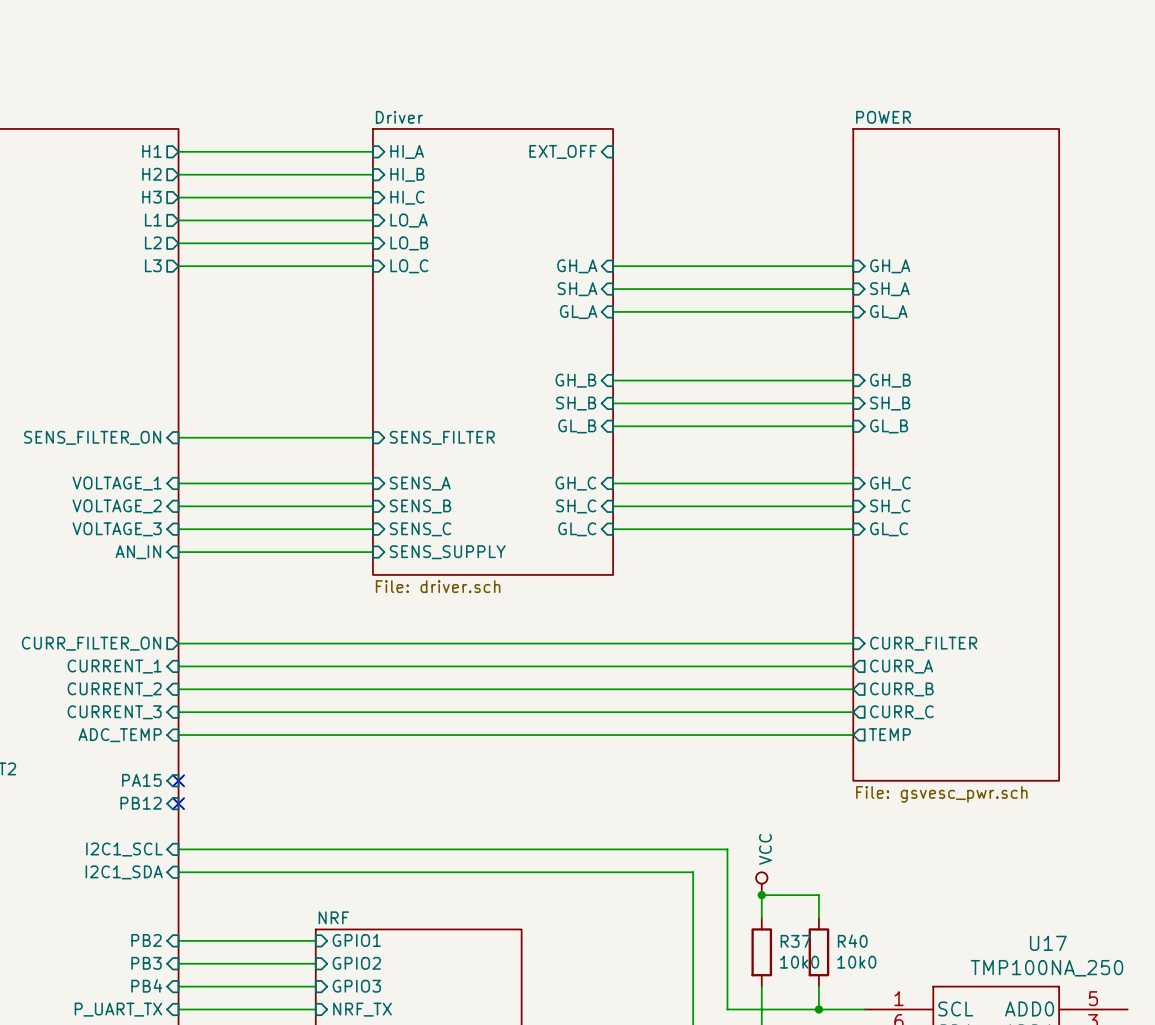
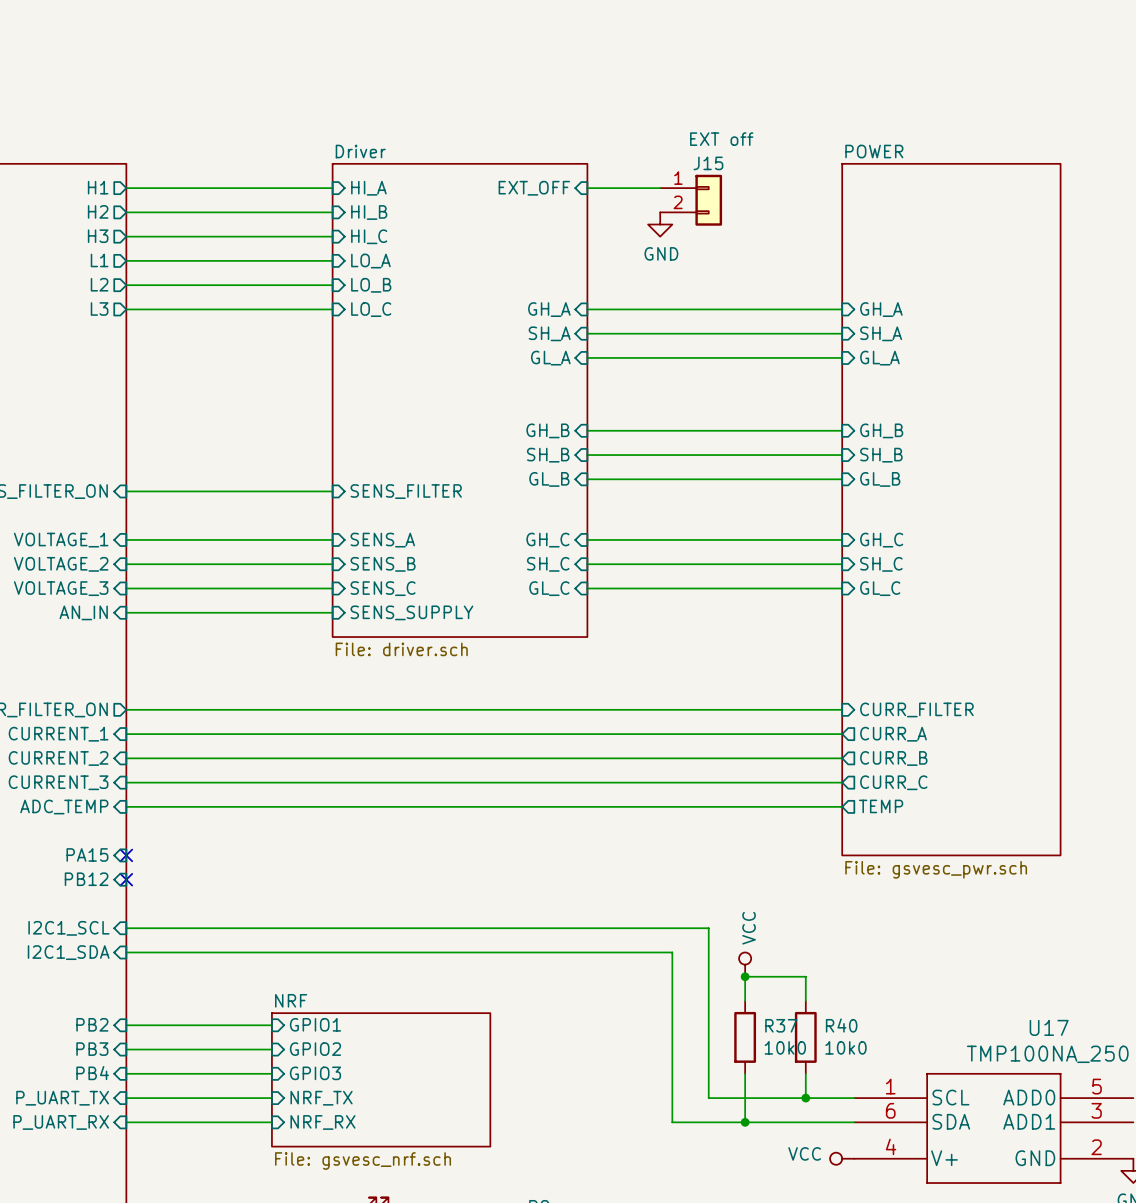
wire: none -> (587, 188) (660, 188)
J15: none -> EXT off (691, 200)
power symbol: none -> GND (660, 224)

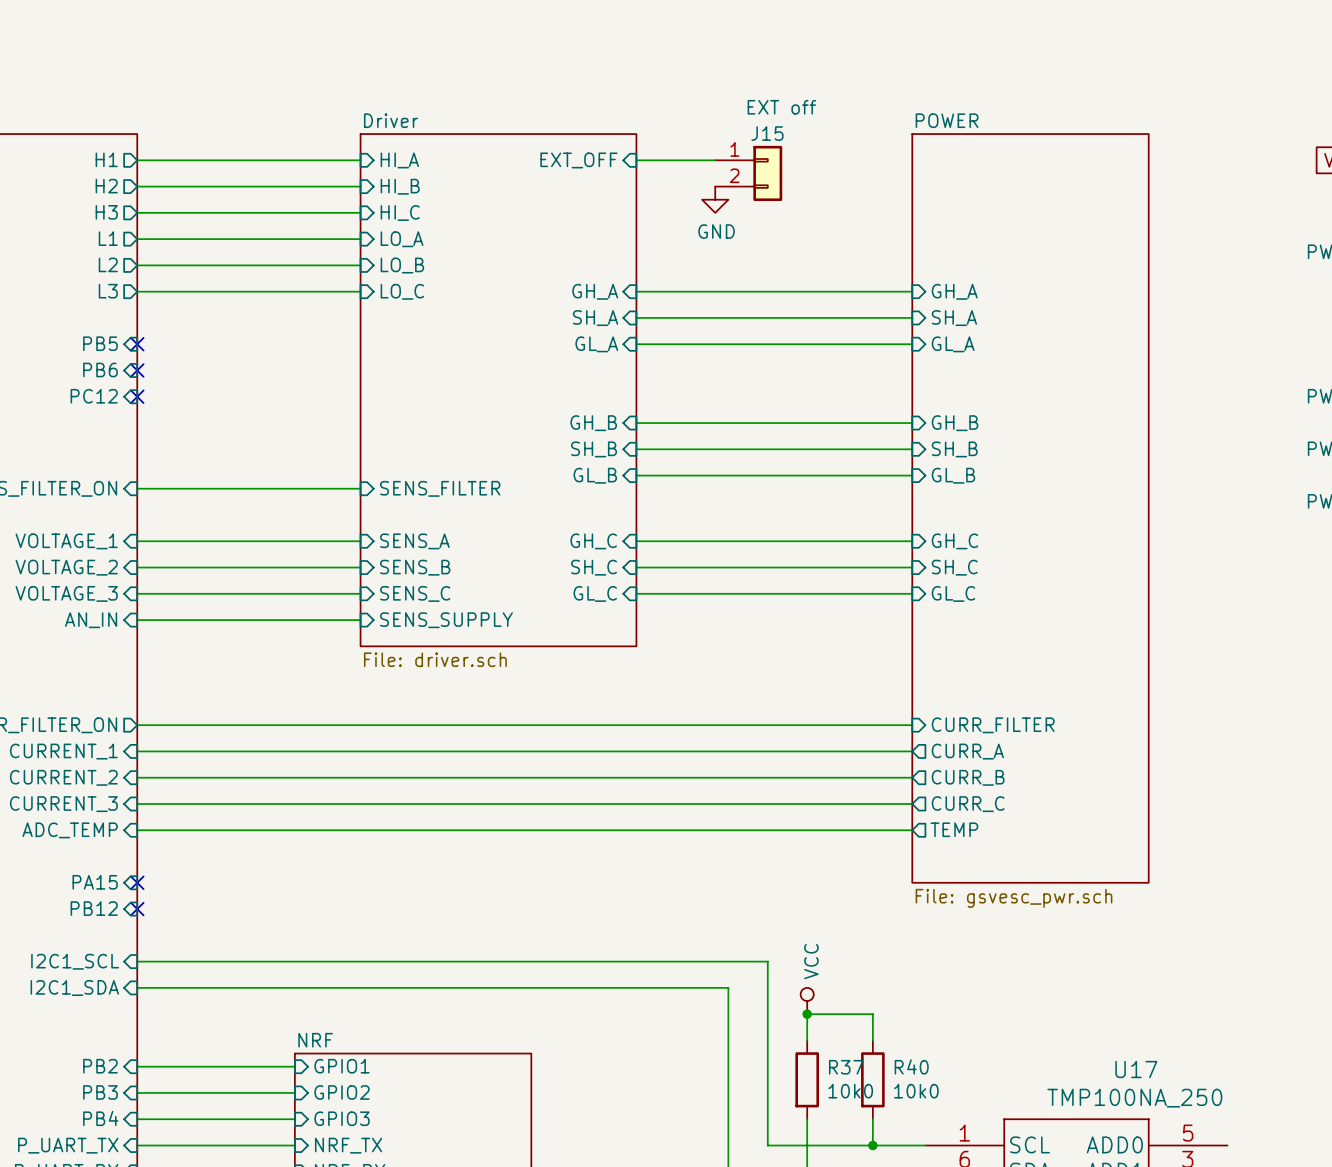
sheet pin: none -> PB5 (100, 343)
no-connect mark: none -> (137, 344)
sheet pin: none -> PB6 (100, 370)
no-connect mark: none -> (137, 370)
sheet pin: none -> PC12 (94, 396)
no-connect mark: none -> (137, 396)

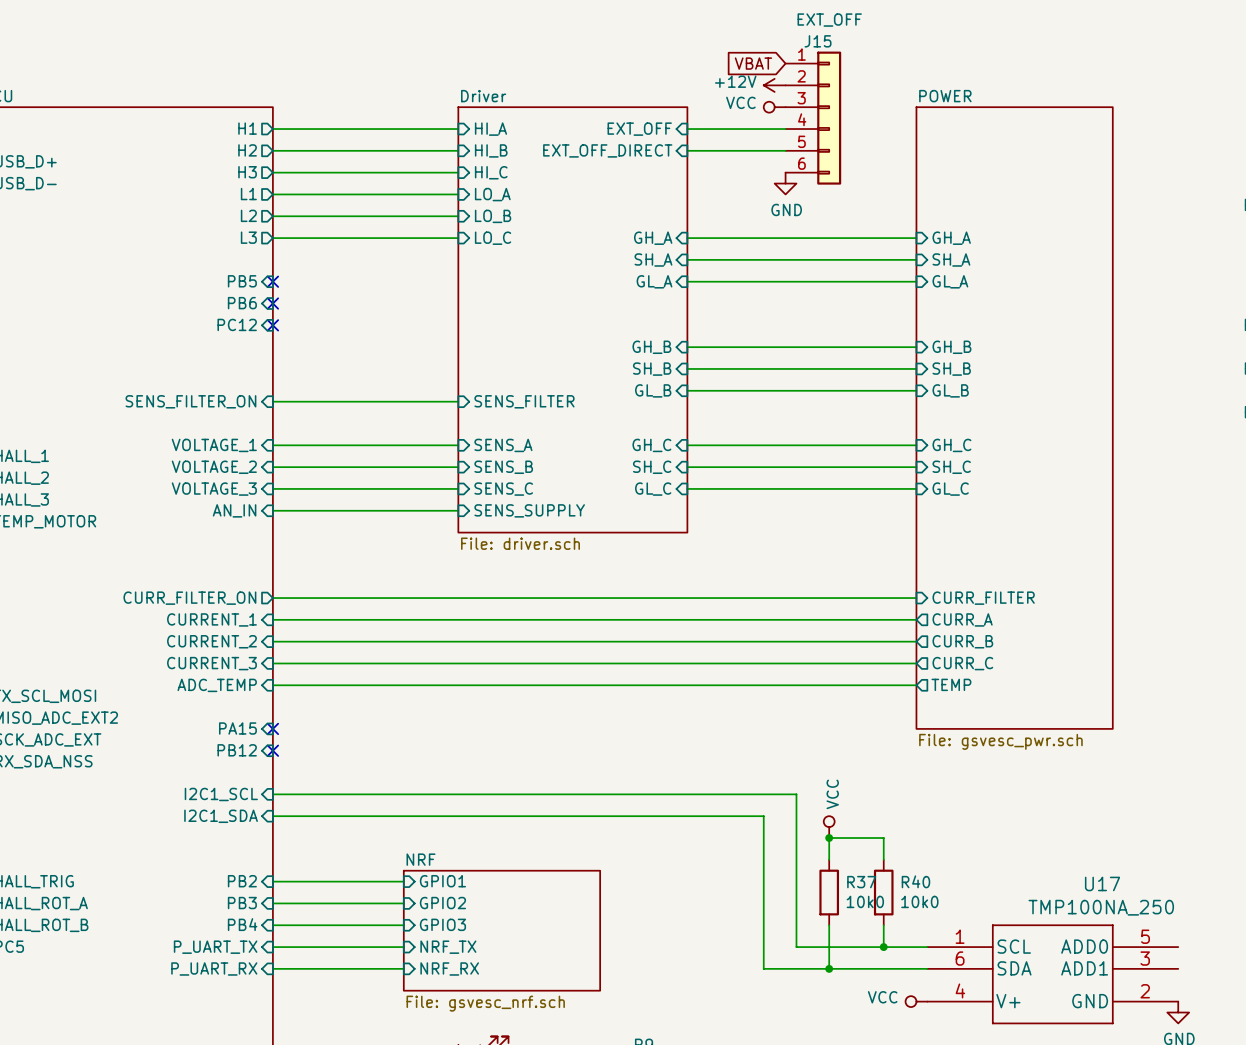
global label: none -> VBAT (753, 63)
power symbol: none -> +12V (774, 85)
J15 value: EXT off (781, 107) -> EXT_OFF (829, 20)
J15 name position: J15 (767, 133) -> J15 (818, 41)
power symbol: none -> VCC (774, 107)
J15 symbol: [715, 145, 783, 202] -> [785, 51, 842, 185]
sheet pin: none -> EXT_OFF_DIRECT (607, 150)
wire: none -> (687, 150) (785, 150)
power symbol position: GND (715, 199) -> GND (785, 183)

